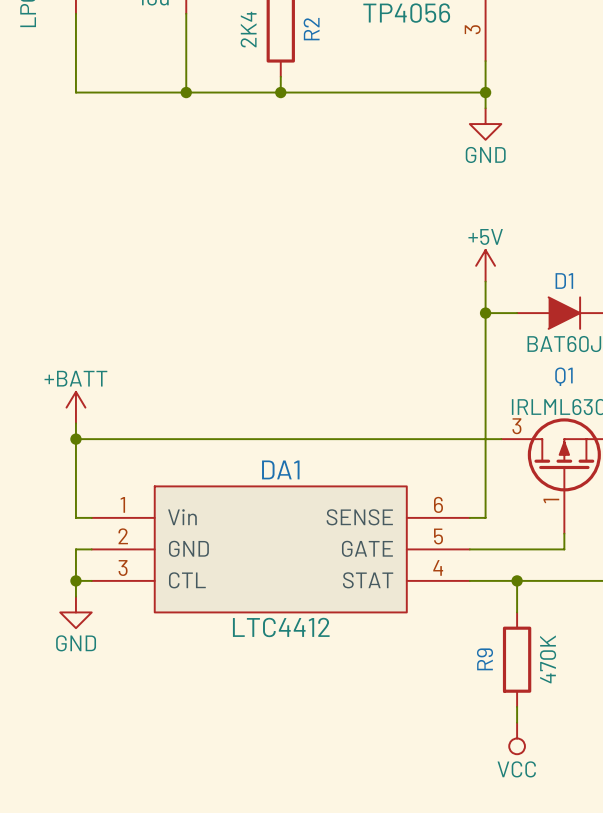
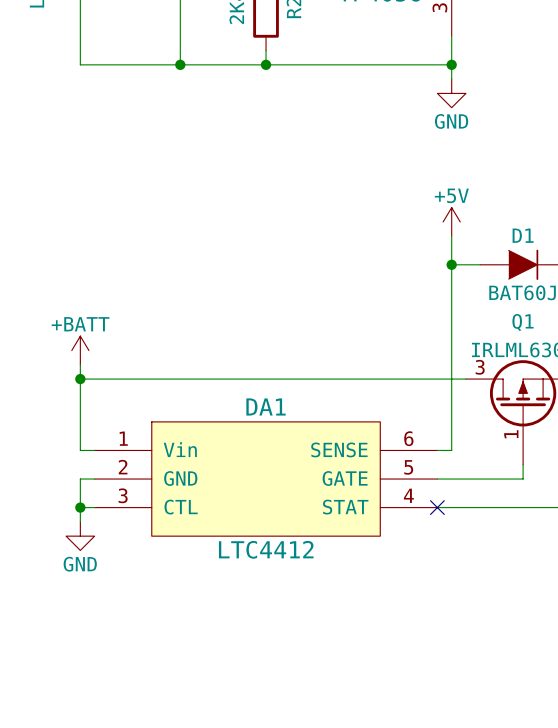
no-connect mark: none -> (437, 507)
wire: (517, 580) (517, 612) -> none
junction: (517, 580) -> none
R9: 470K (517, 659) -> none
wire: (517, 706) (517, 722) -> none
power symbol: VCC (517, 738) -> none

